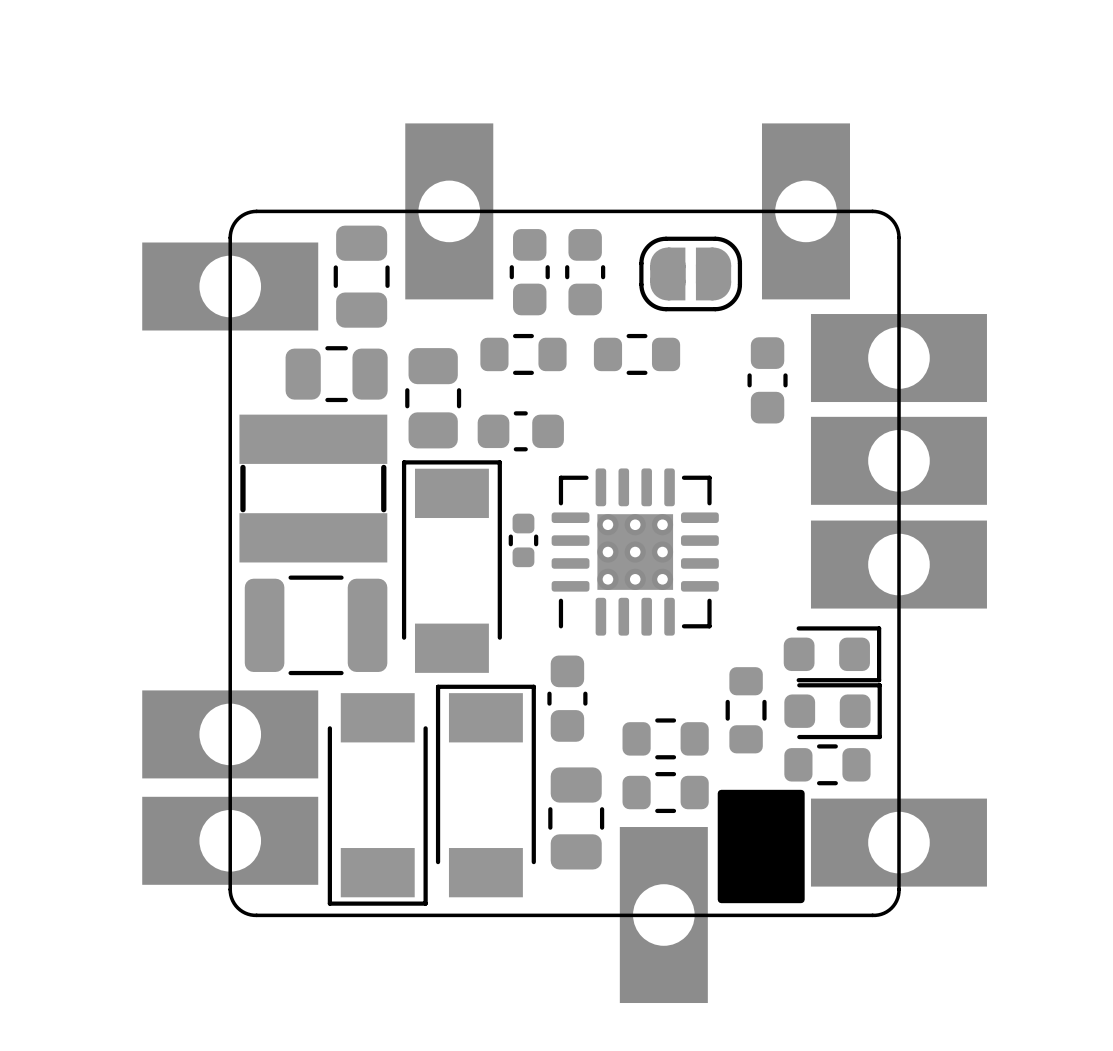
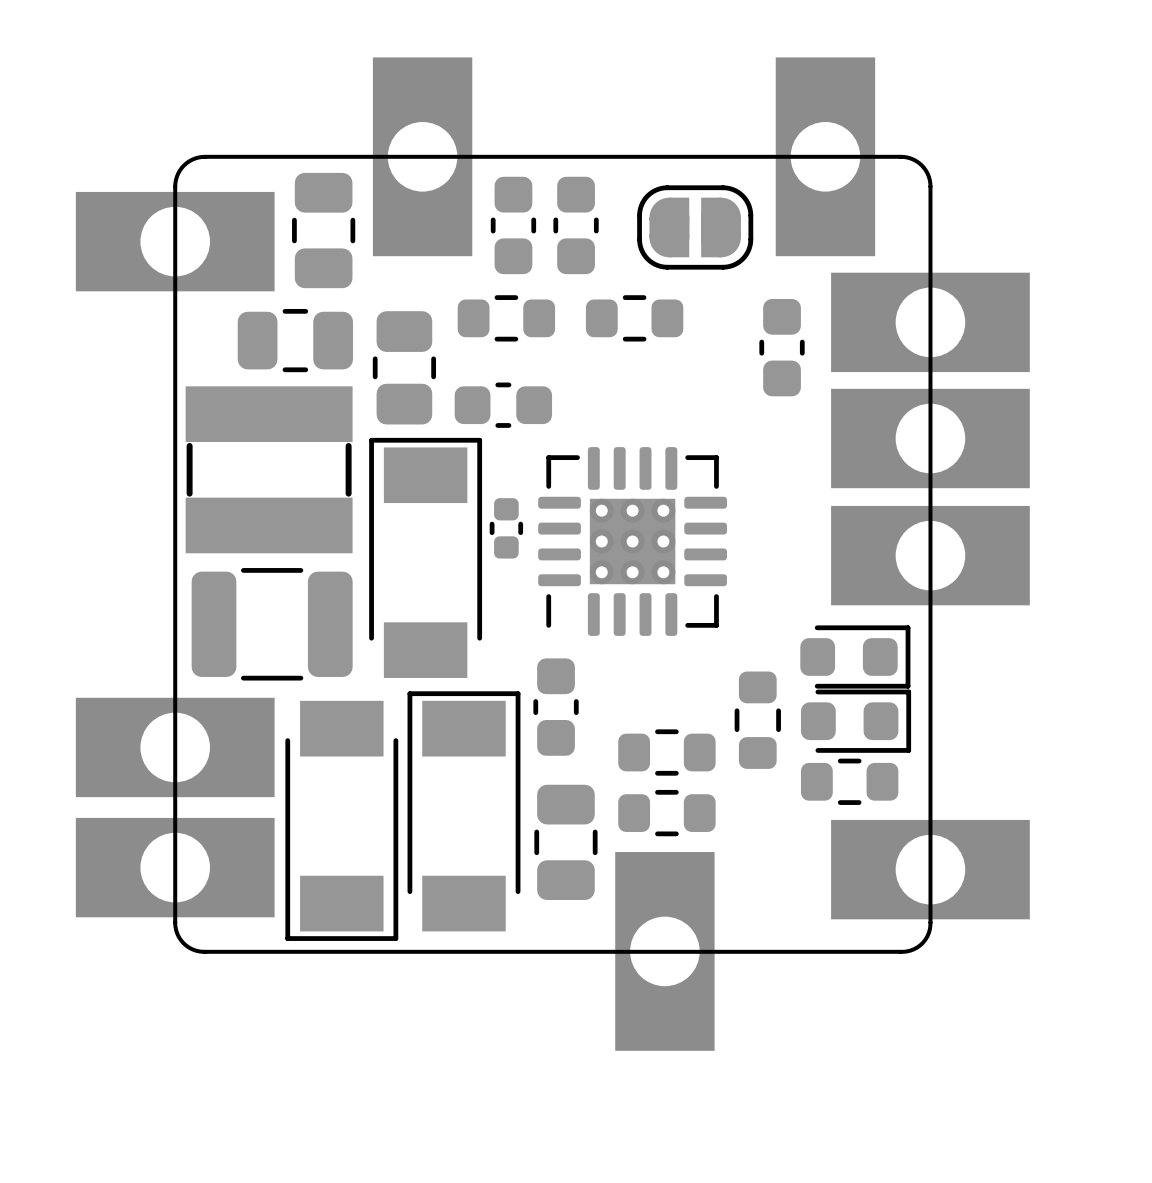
drawing: [717, 789, 805, 904] -> none

